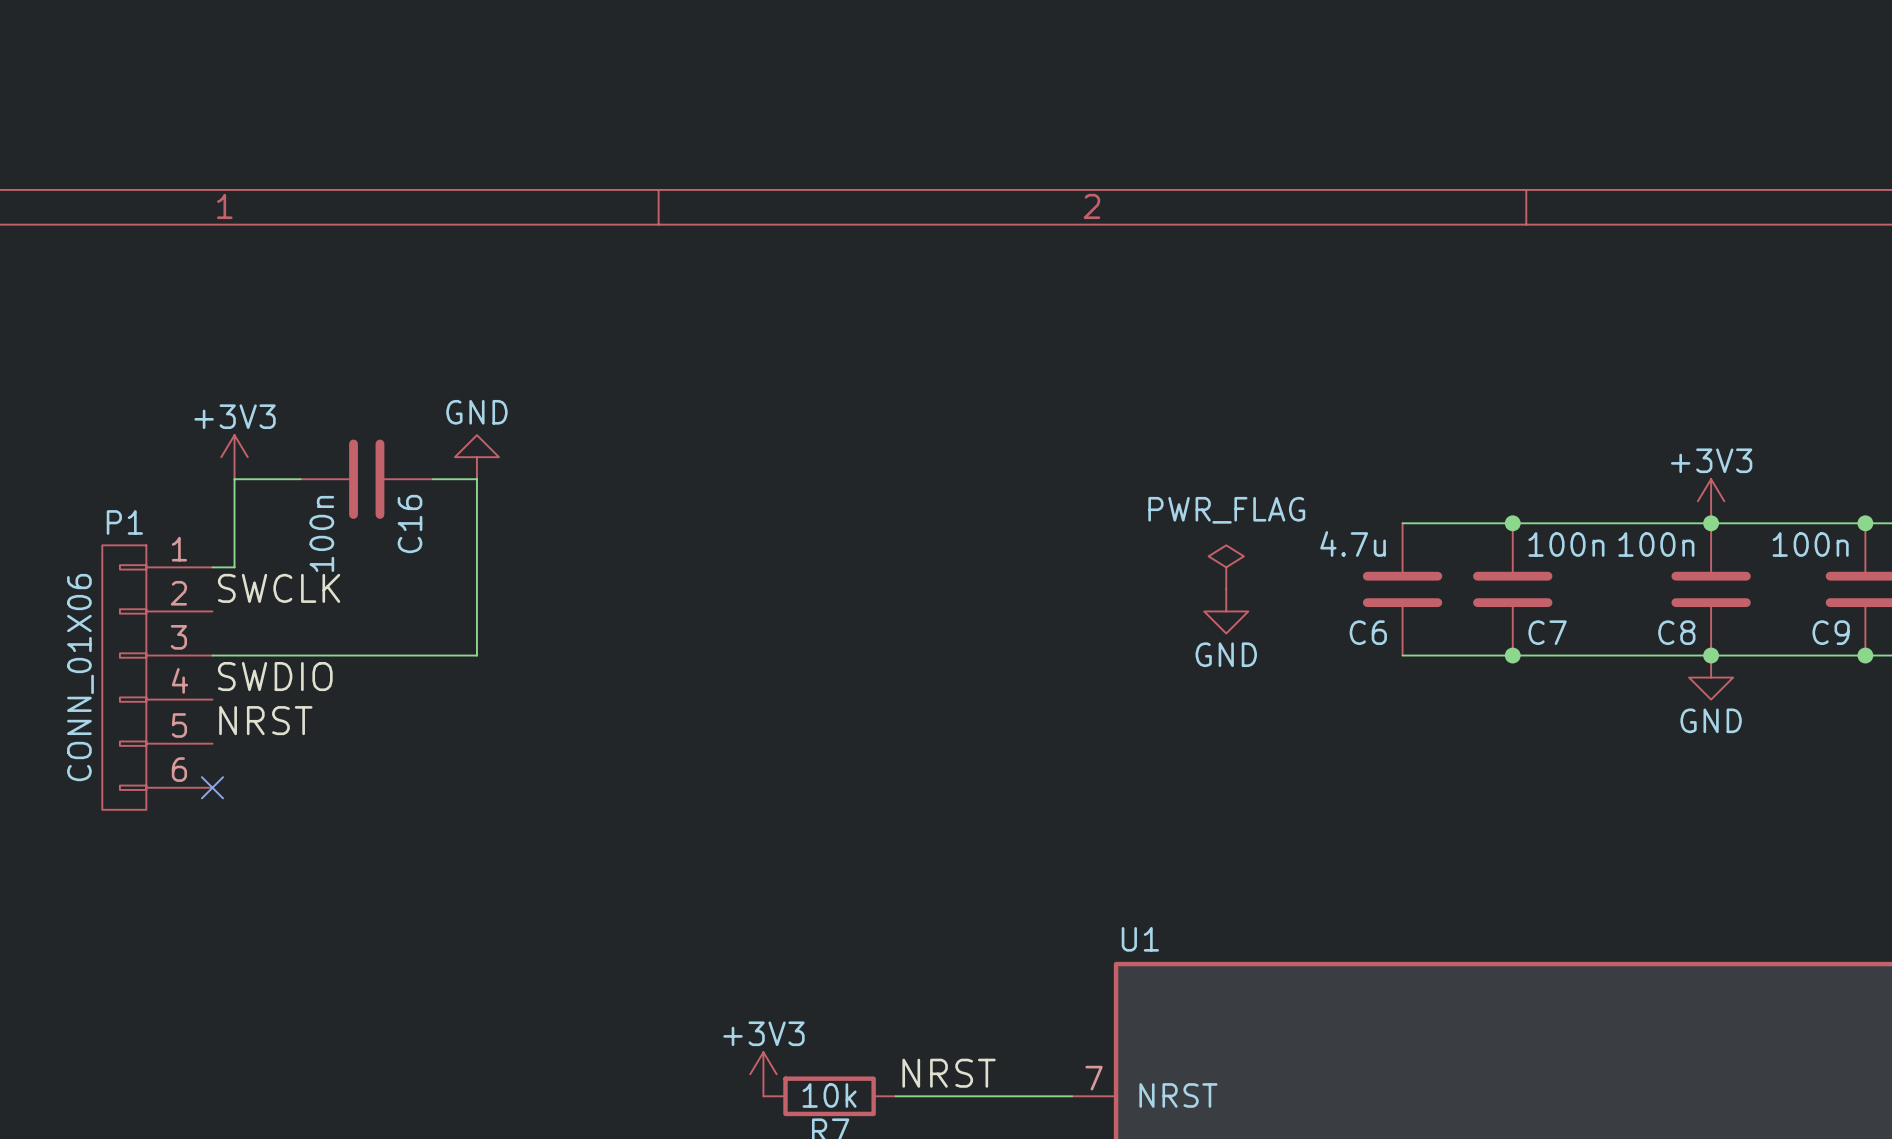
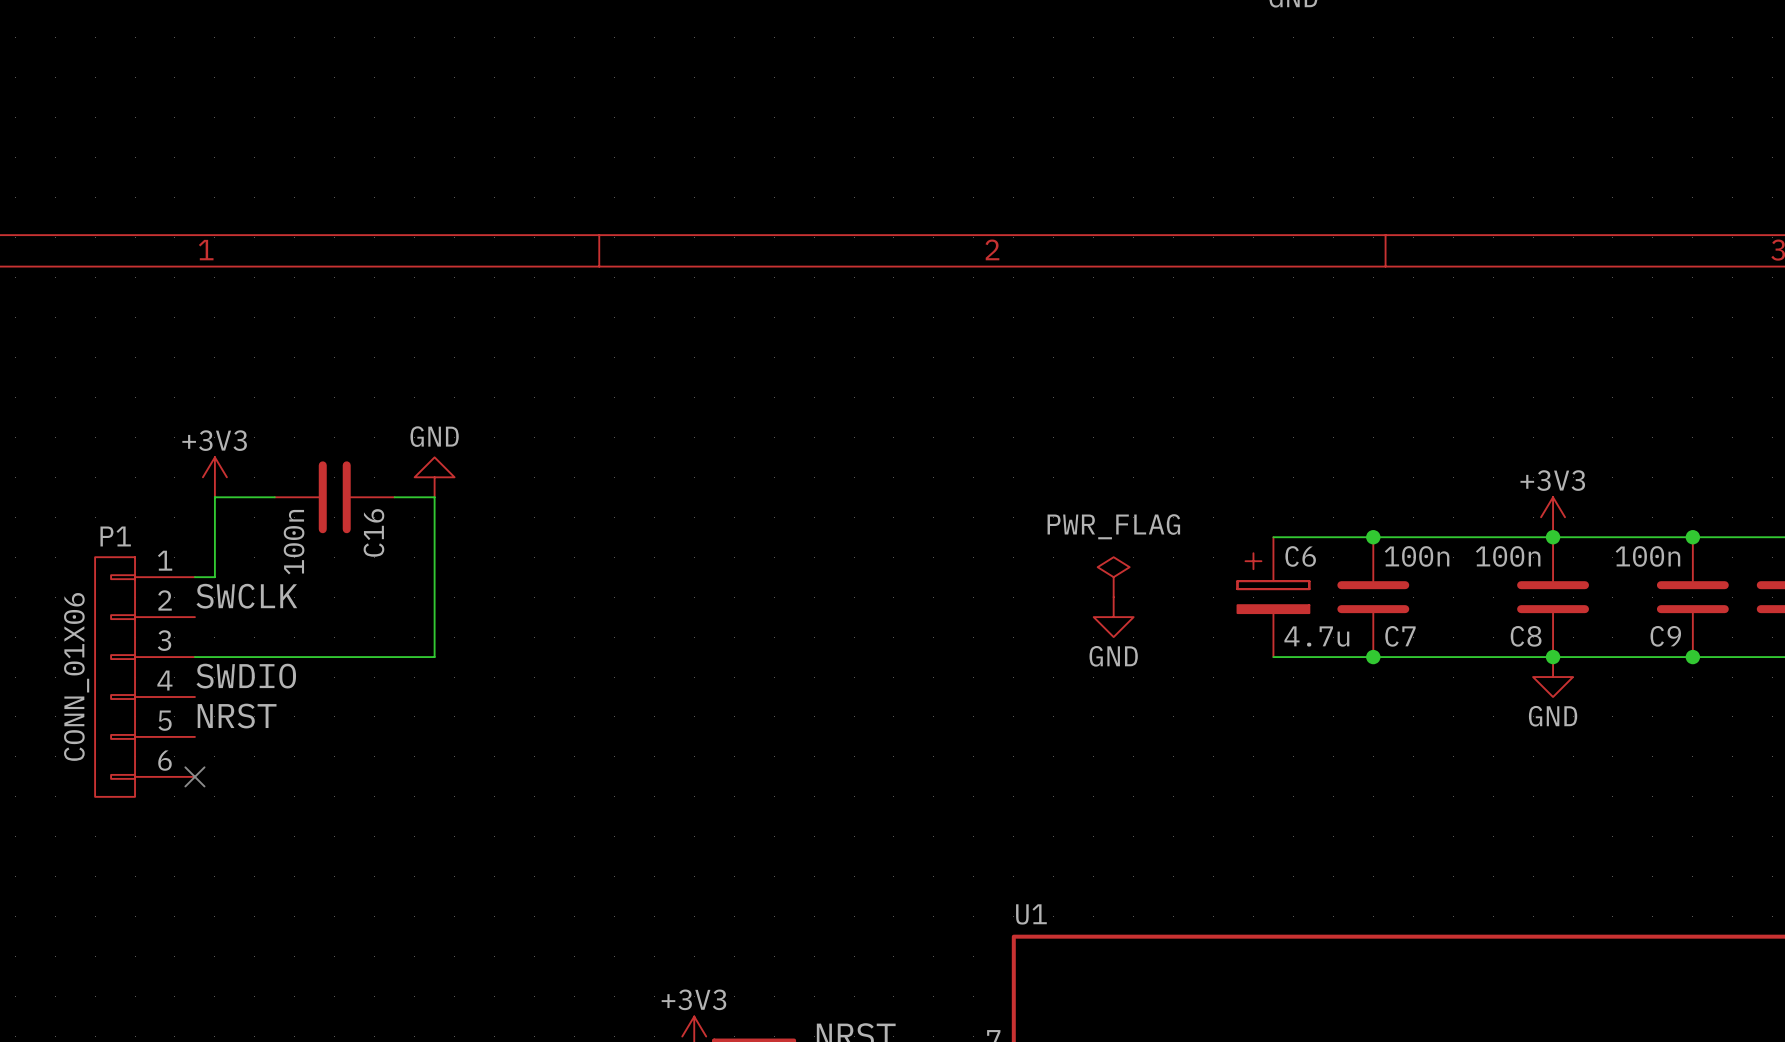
C6 symbol: [1362, 523, 1443, 656] -> [1237, 537, 1310, 658]
C6 value position: 4.7u (1353, 543) -> 4.7u (1316, 636)
C6 name position: C6 (1368, 632) -> C6 (1300, 556)

